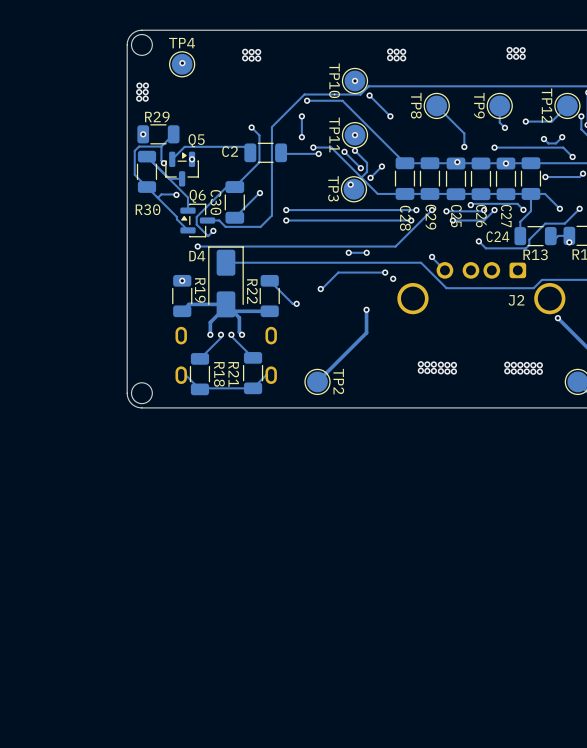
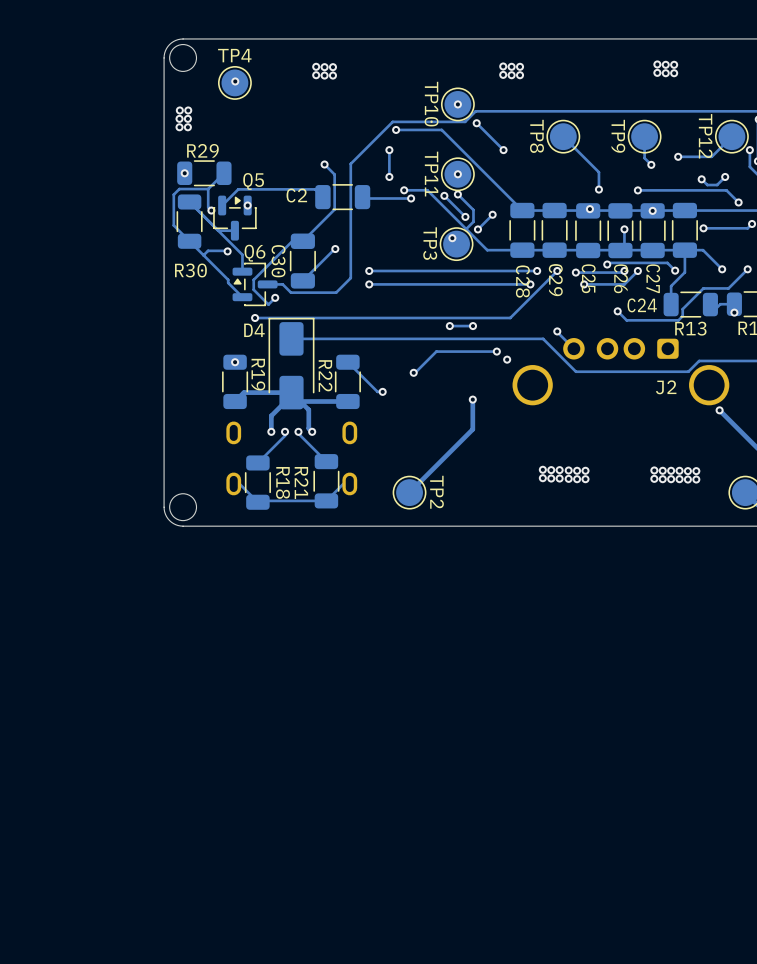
track: none -> (624, 229) (624, 246) (620, 250)
via: none -> (624, 229)

